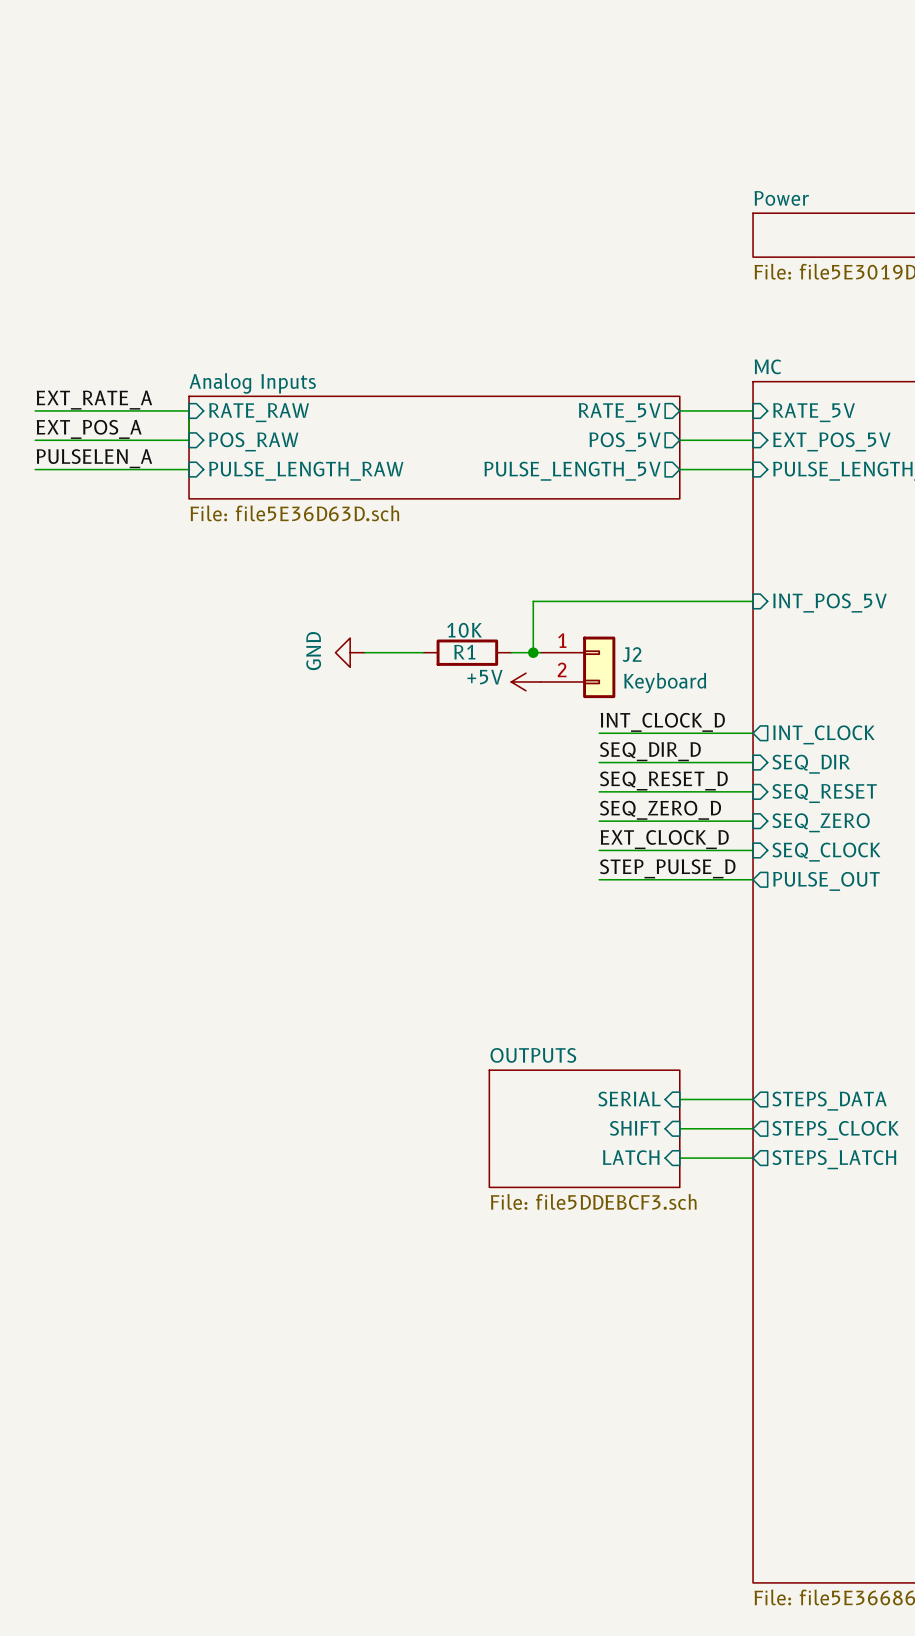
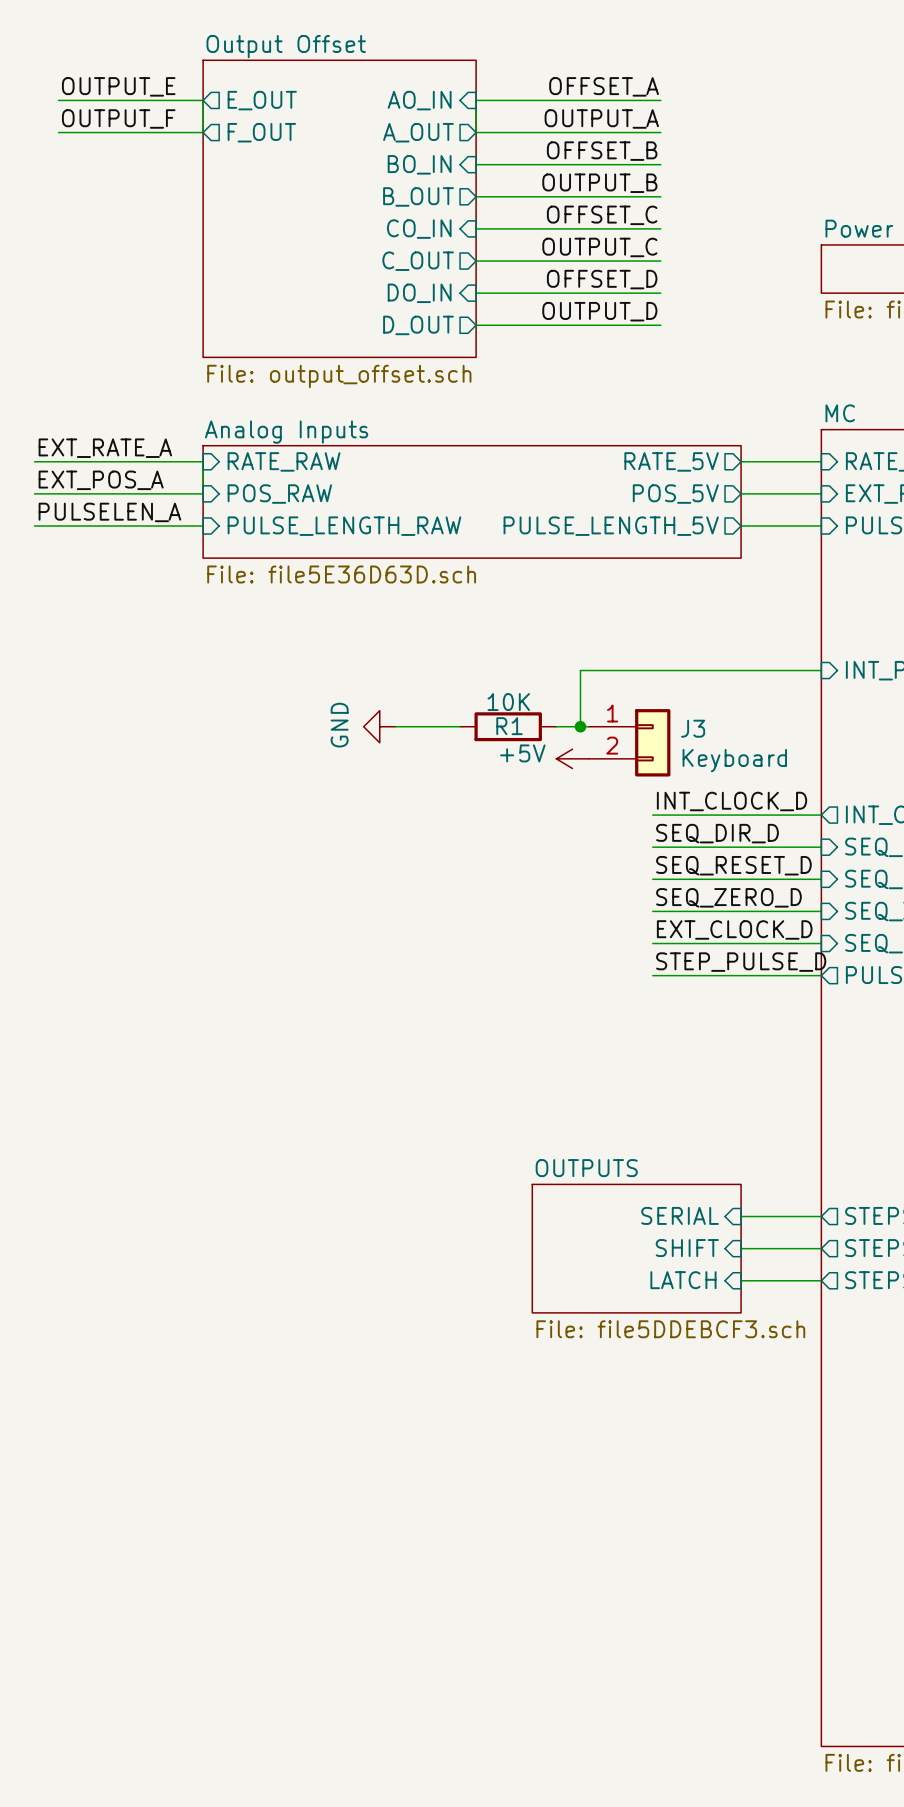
label: none -> OUTPUT_E (118, 86)
label: none -> OFFSET_A (604, 86)
wire: none -> (58, 100) (203, 100) (203, 132) (58, 132)
wire: none -> (660, 100) (476, 100) (476, 132) (660, 132)
sheet pin: none -> E_OUT (262, 100)
sheet pin: none -> AO_IN (419, 100)
label: none -> OUTPUT_F (118, 118)
label: none -> OUTPUT_A (601, 118)
sheet pin: none -> F_OUT (261, 132)
sheet pin: none -> A_OUT (418, 132)
label: none -> OFFSET_B (602, 151)
wire: none -> (476, 164) (660, 164)
sheet pin: none -> BO_IN (419, 164)
label: none -> OUTPUT_B (599, 183)
wire: none -> (476, 196) (660, 196)
sheet pin: none -> B_OUT (418, 196)
sheet Output Offset: none -> File: output_offset.sch (339, 208)
label: none -> OFFSET_C (602, 215)
wire: none -> (476, 228) (660, 228)
sheet pin: none -> CO_IN (419, 229)
label: none -> OUTPUT_C (599, 247)
wire: none -> (476, 261) (660, 261)
sheet pin: none -> C_OUT (418, 261)
label: none -> OFFSET_D (602, 279)
wire: none -> (476, 293) (660, 293)
sheet pin: none -> DO_IN (419, 293)
label: none -> OUTPUT_D (599, 311)
wire: none -> (476, 325) (660, 325)
sheet pin: none -> D_OUT (418, 325)
J2 name: J2 (632, 654) -> J3 (693, 728)

